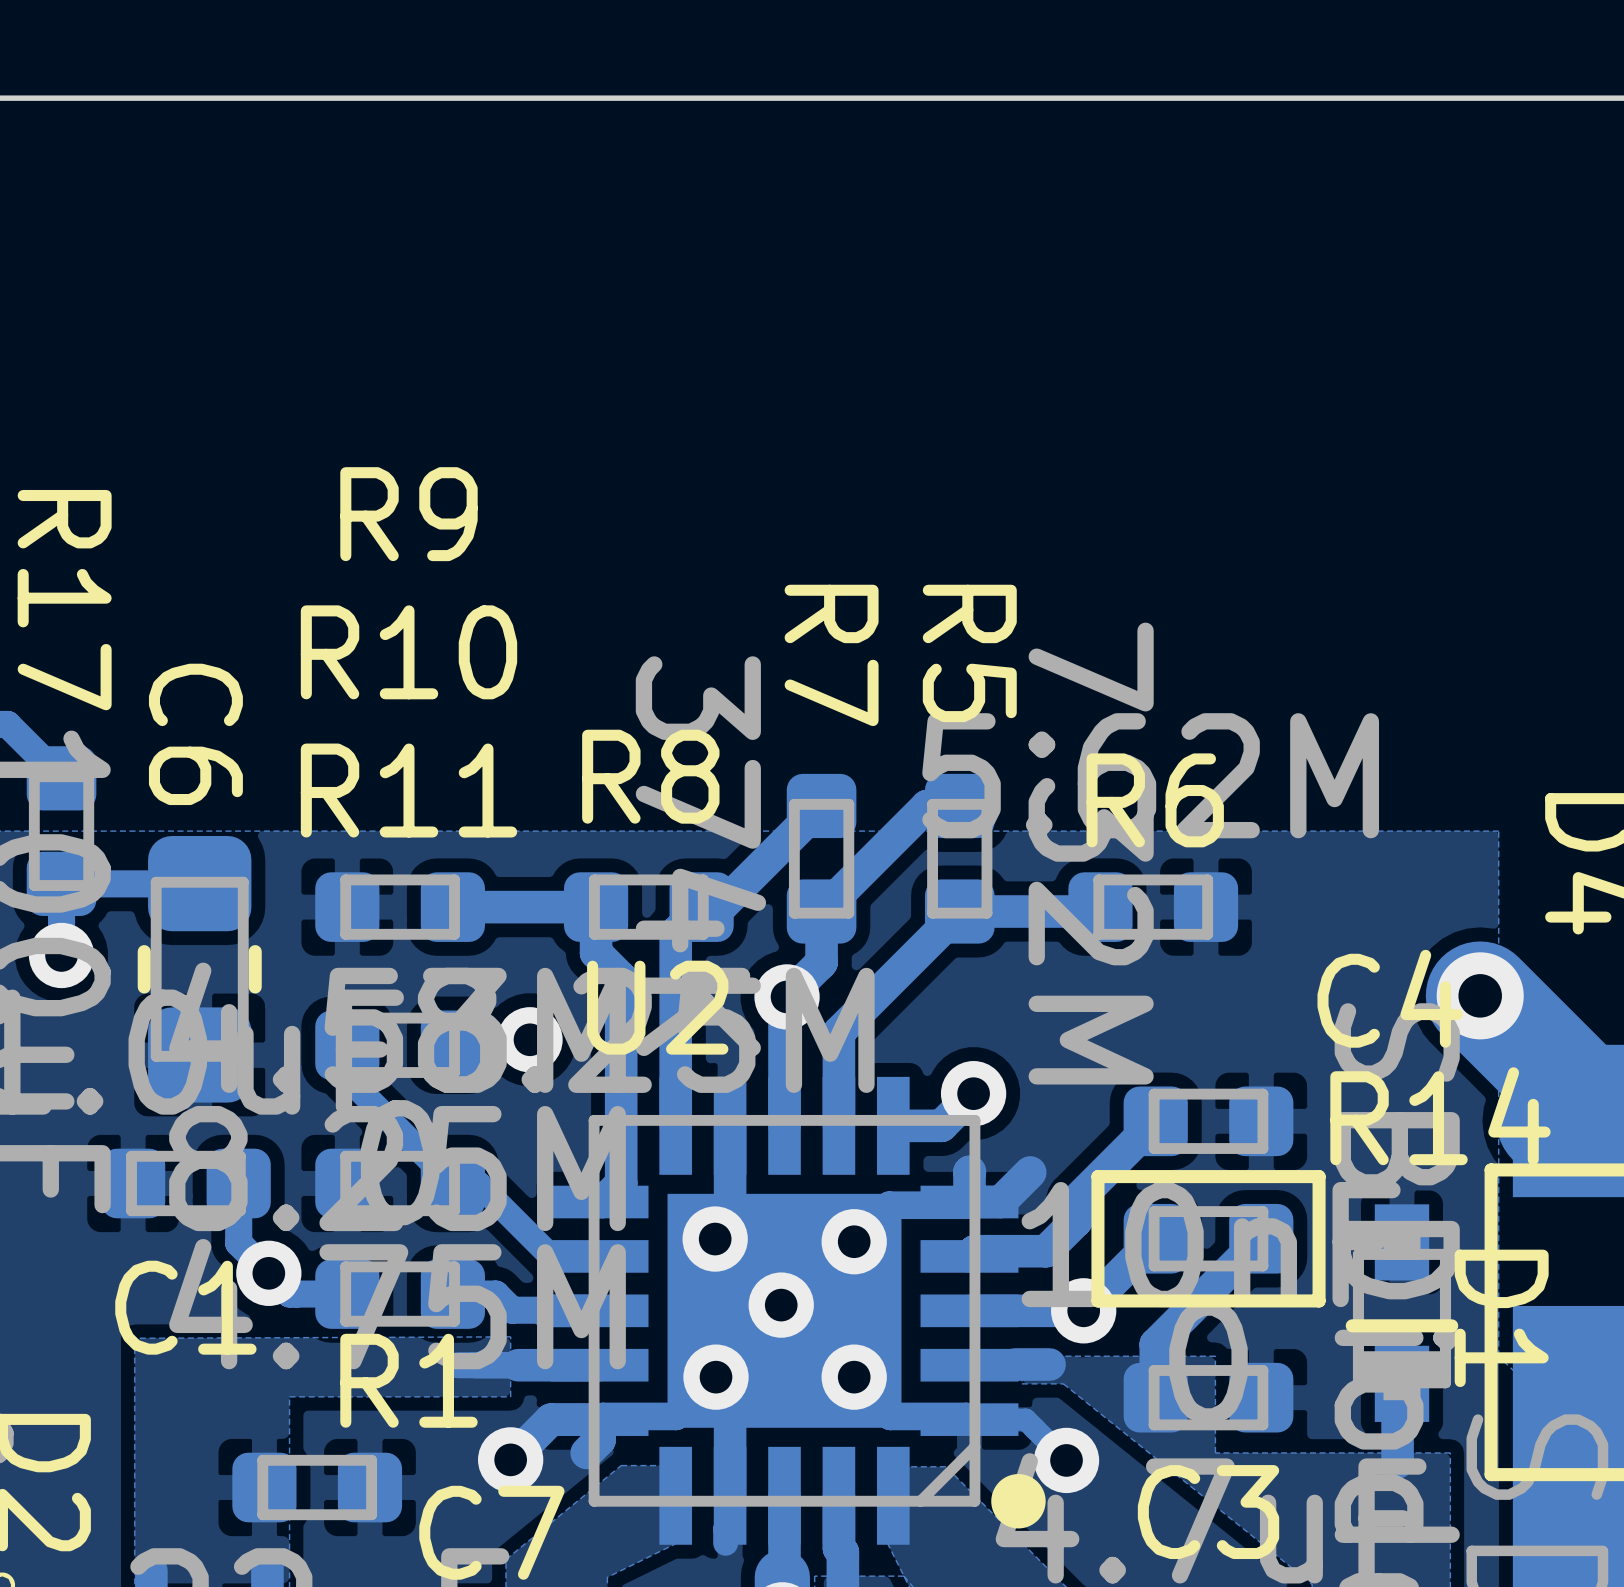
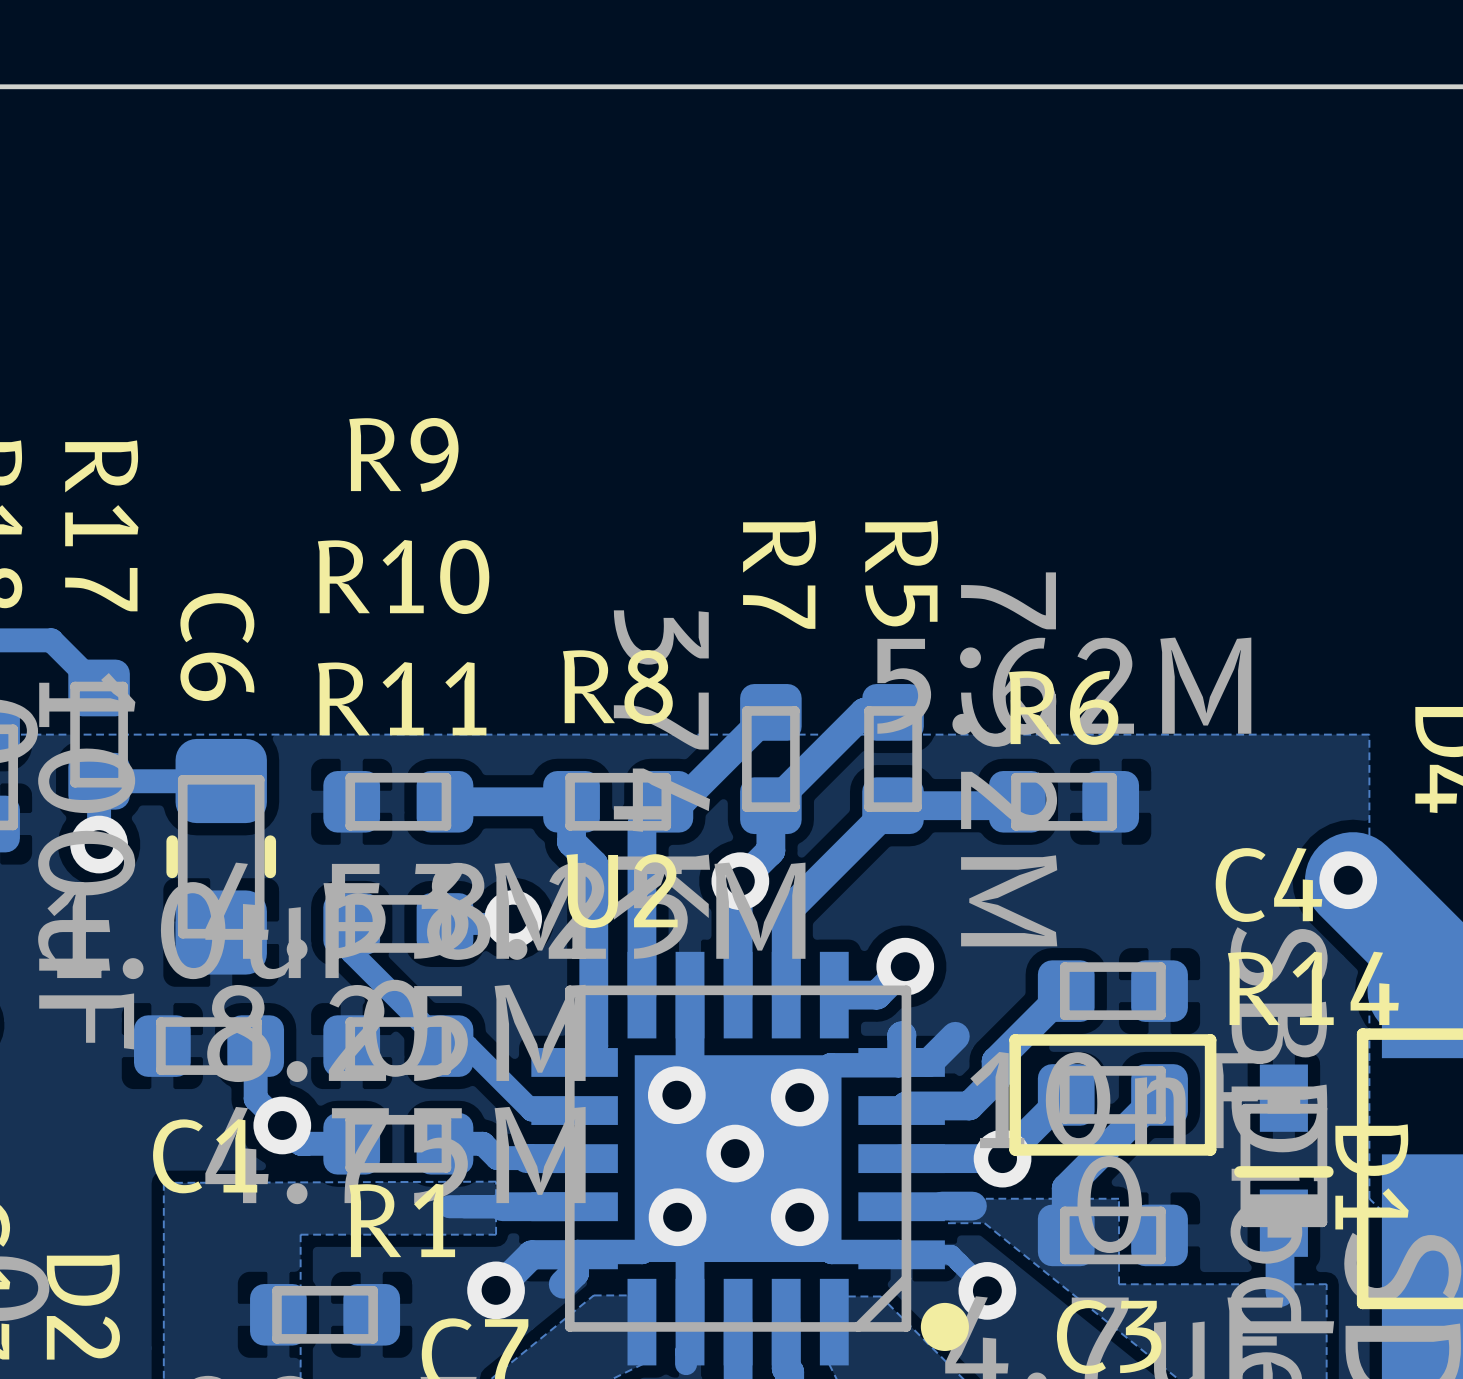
via size: [1436, 952, 1524, 1040] -> [1319, 851, 1378, 910]

